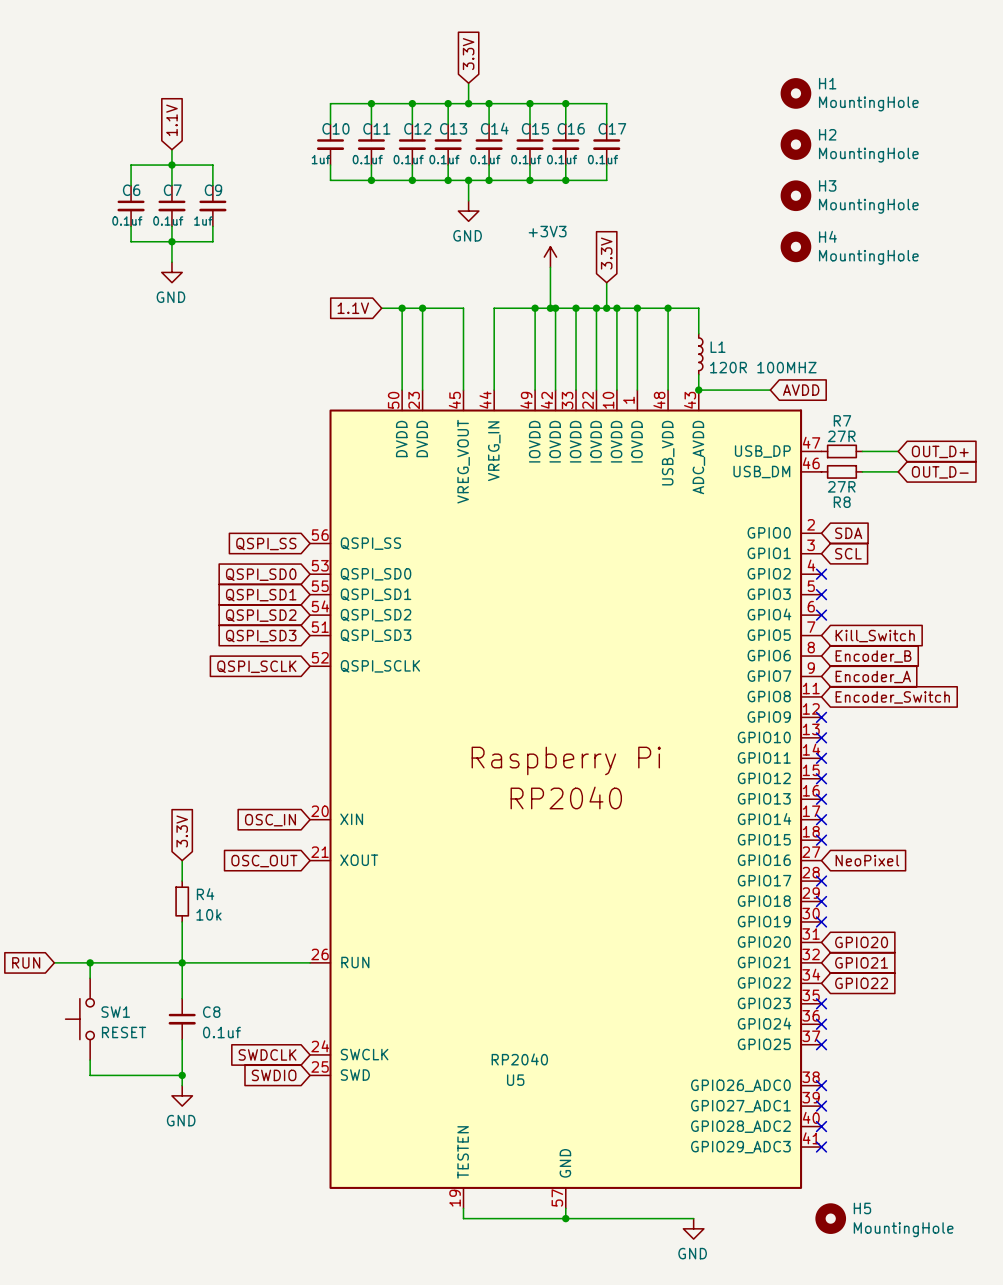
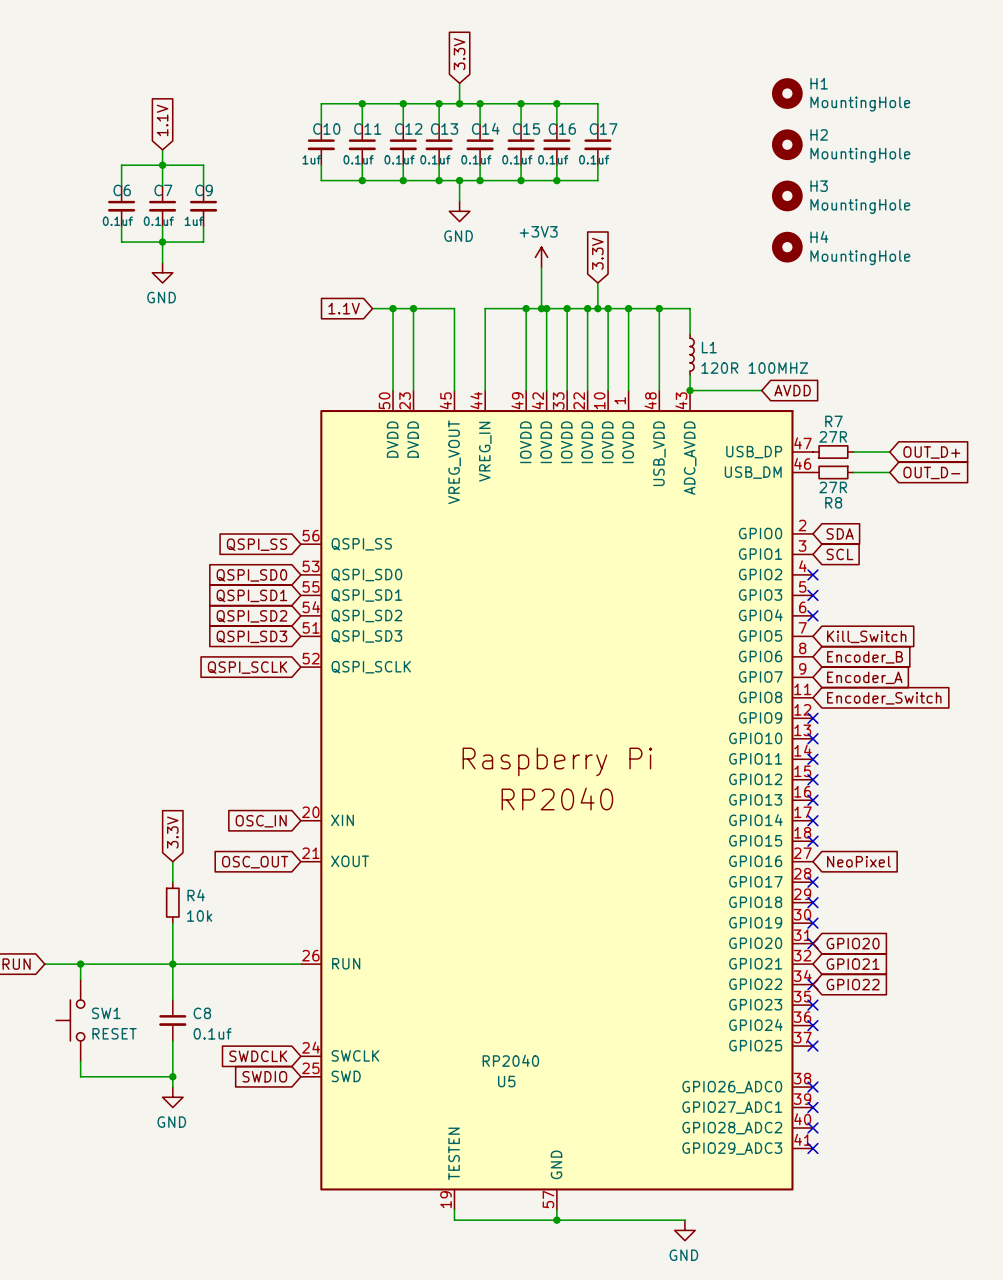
no-connect mark: none -> (812, 943)
no-connect mark: none -> (812, 984)
H5: MountingHole (830, 1218) -> none

